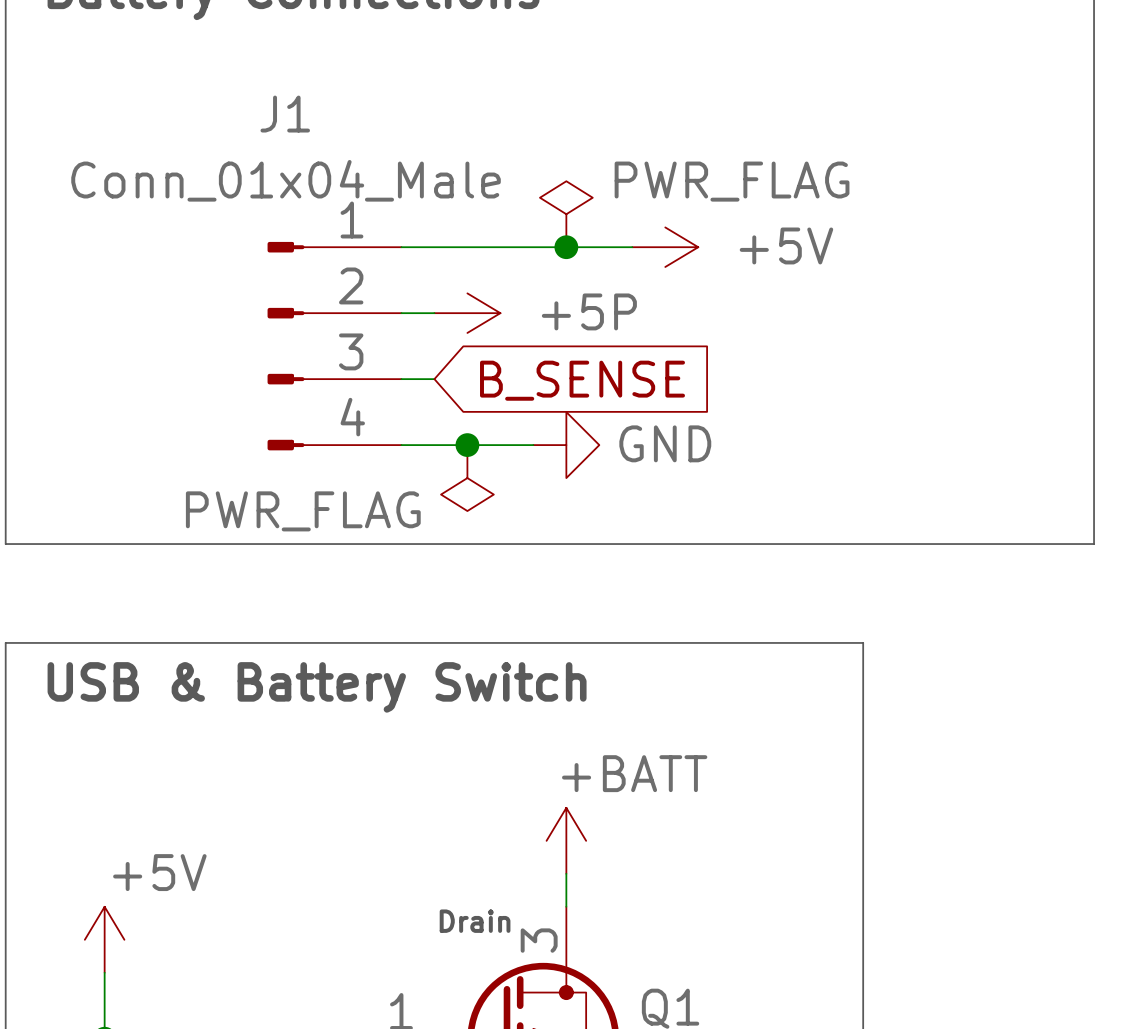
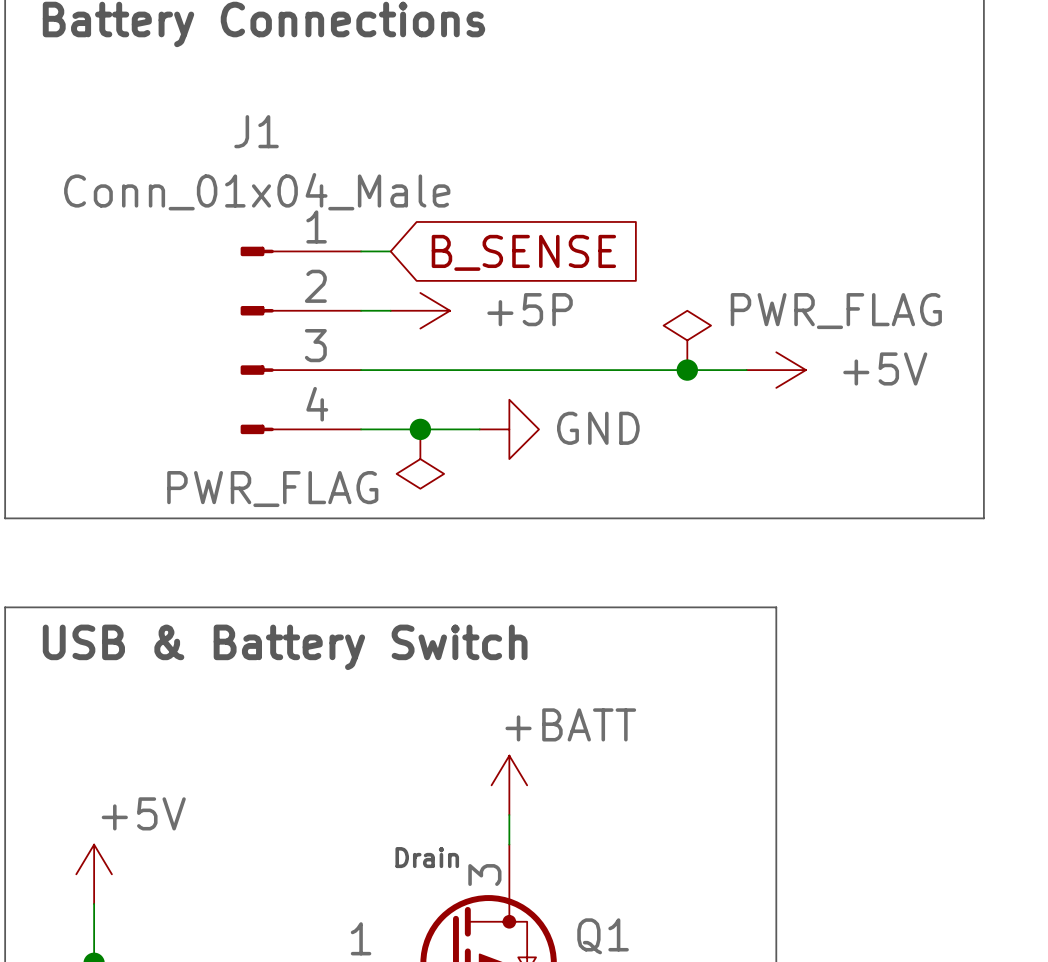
power symbol position: PWR_FLAG (566, 214) -> PWR_FLAG (687, 340)
wire: (434, 247) (632, 247) -> none
junction: (566, 247) -> none
power symbol position: +5V (665, 247) -> +5V (776, 370)
wire: none -> (390, 370) (746, 370)
junction: none -> (687, 370)
global label position: B_SENSE (582, 380) -> B_SENSE (523, 252)

